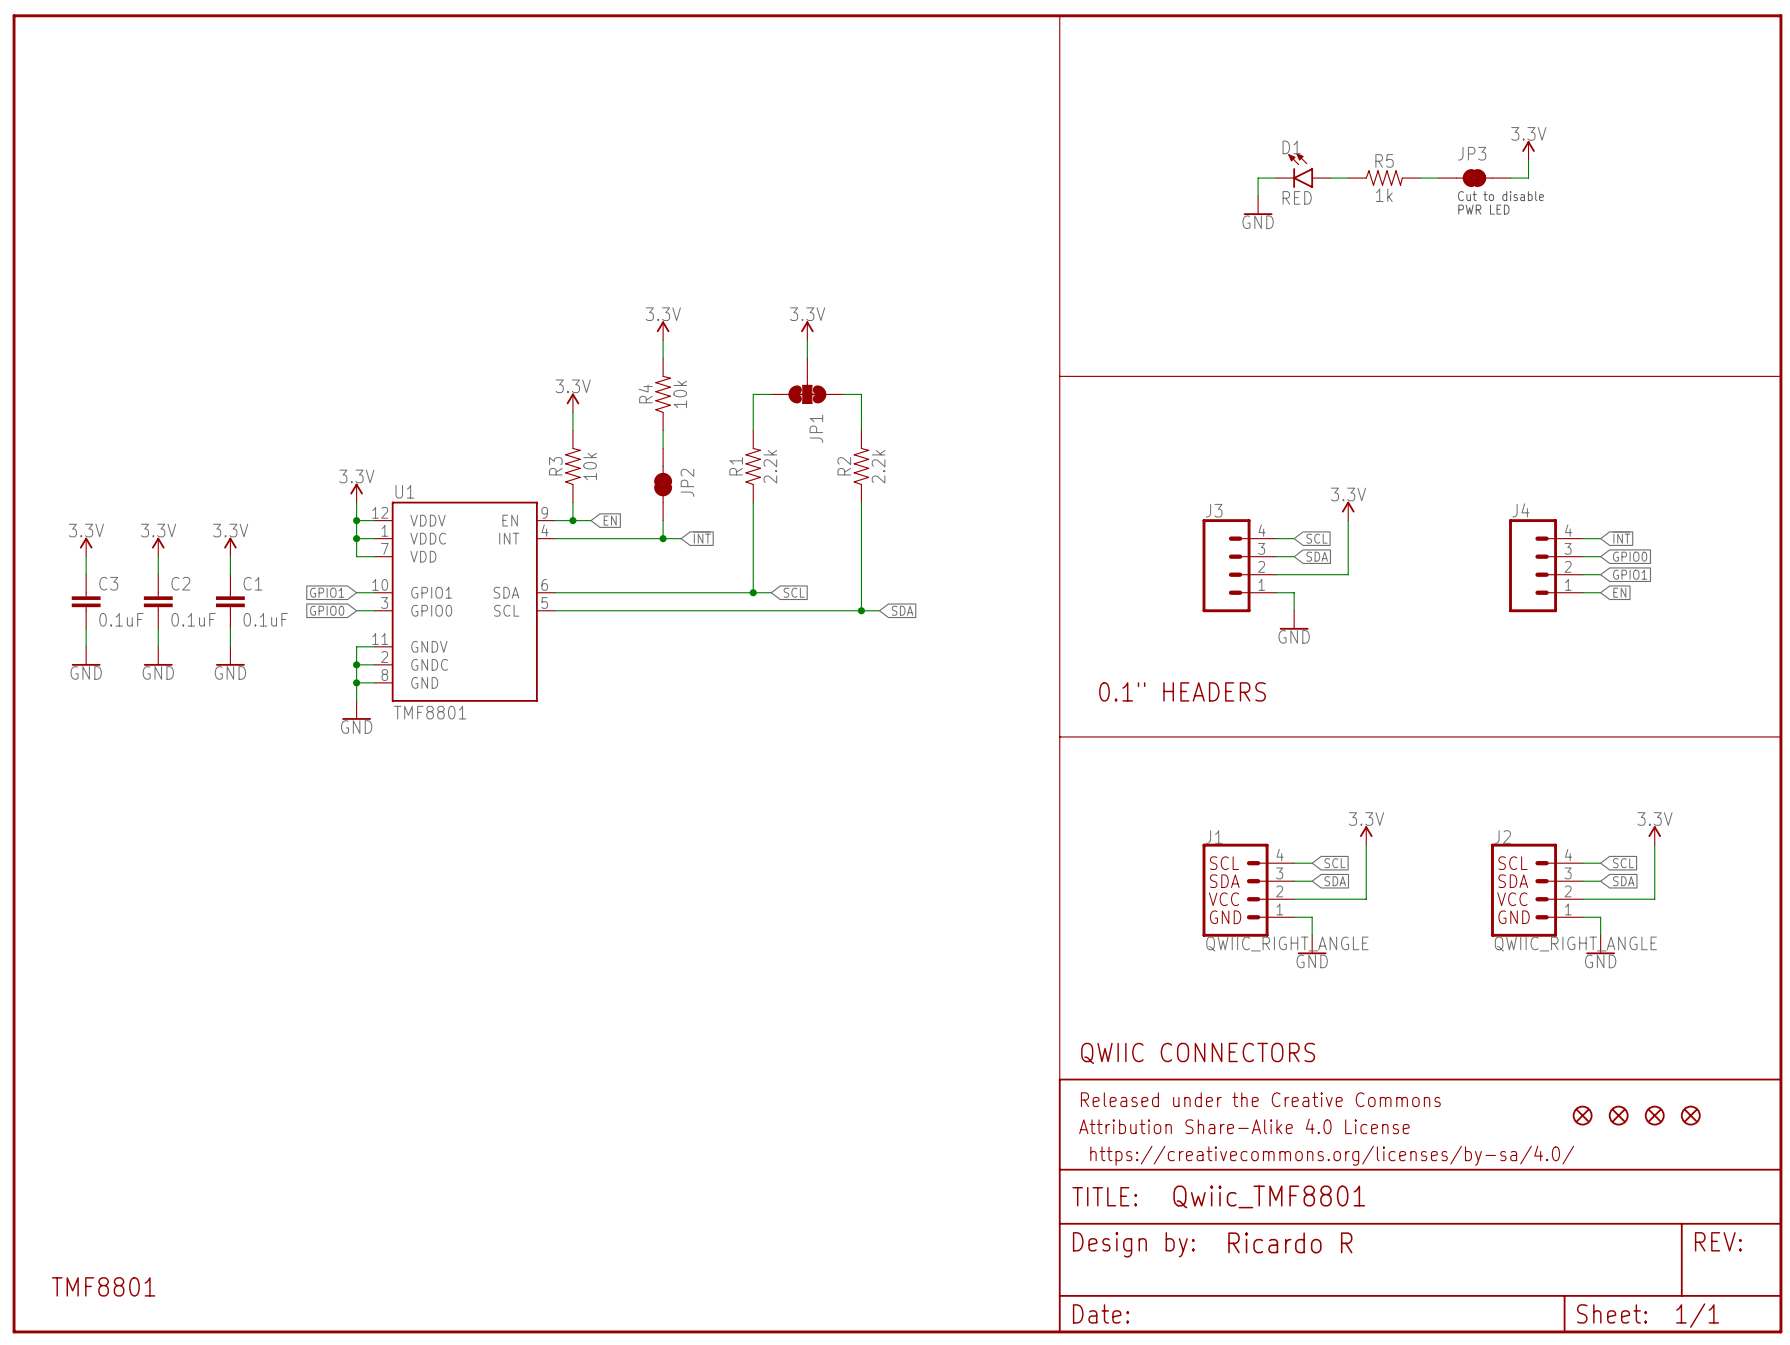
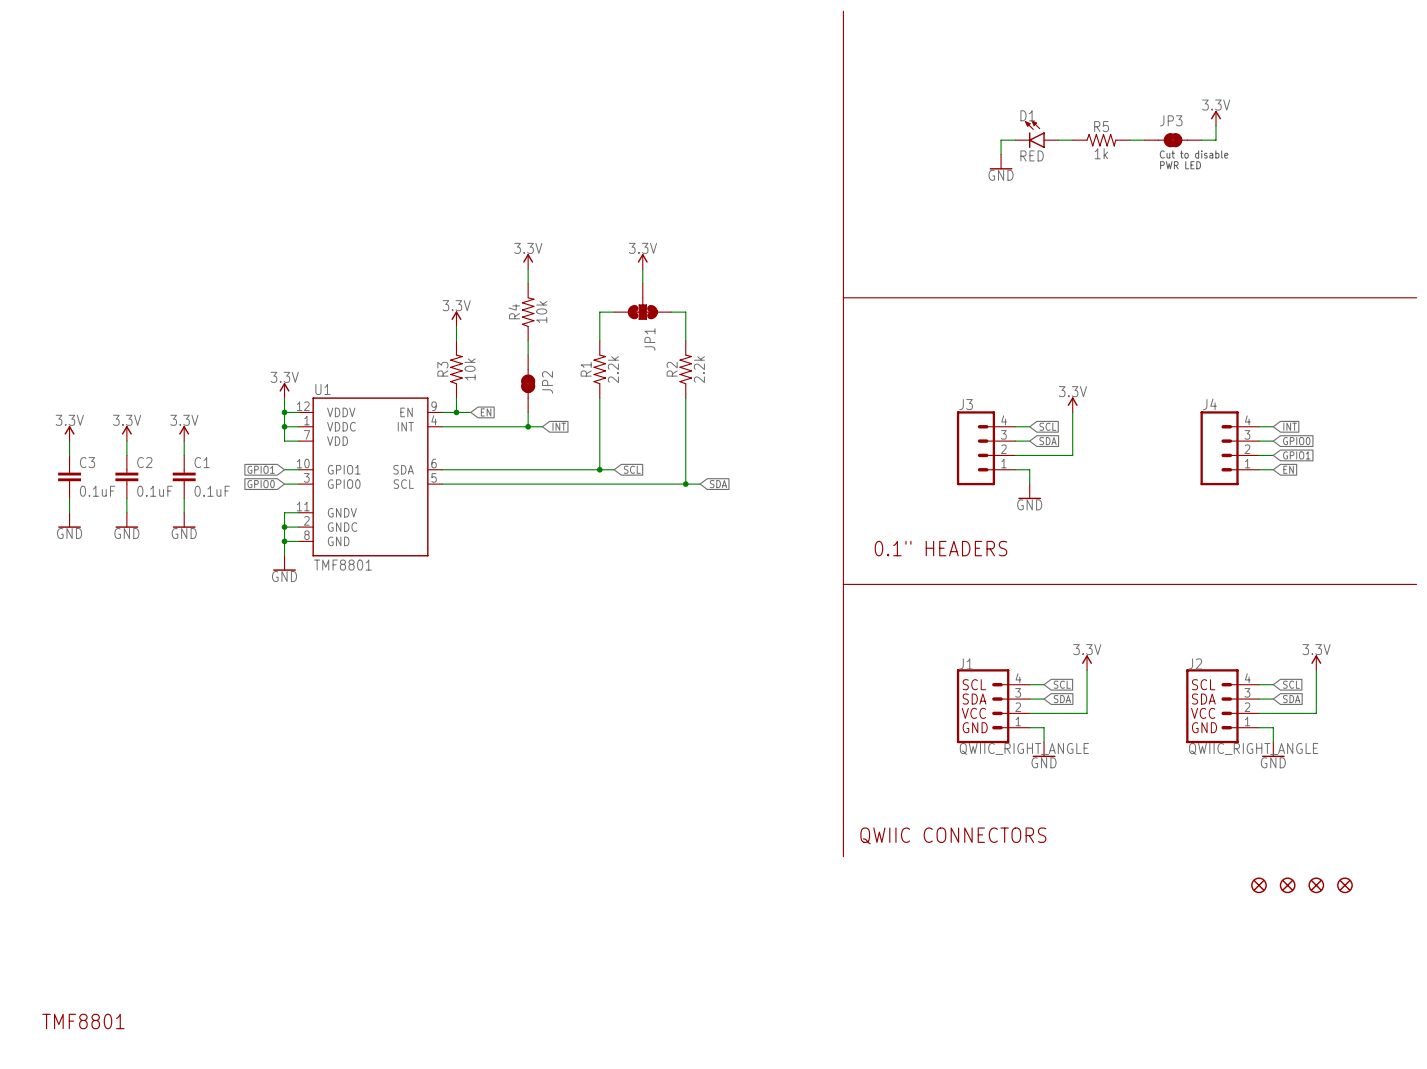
part: (897, 673) -> none
part: (1420, 1205) -> none

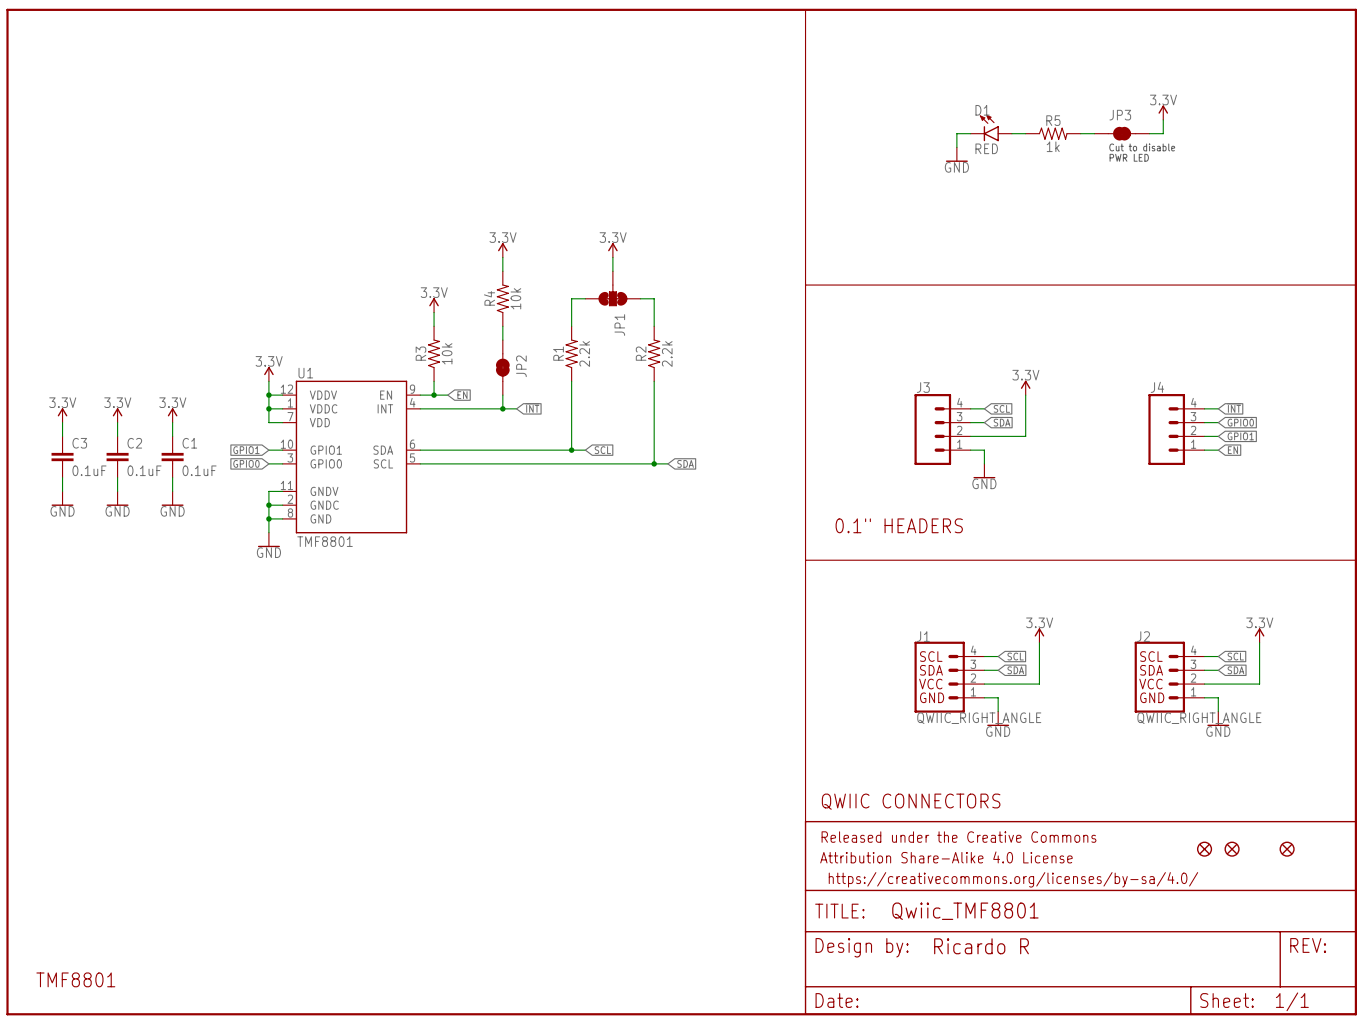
part: none -> (681, 512)
part: (1316, 885) -> none
part: none -> (1080, 917)

